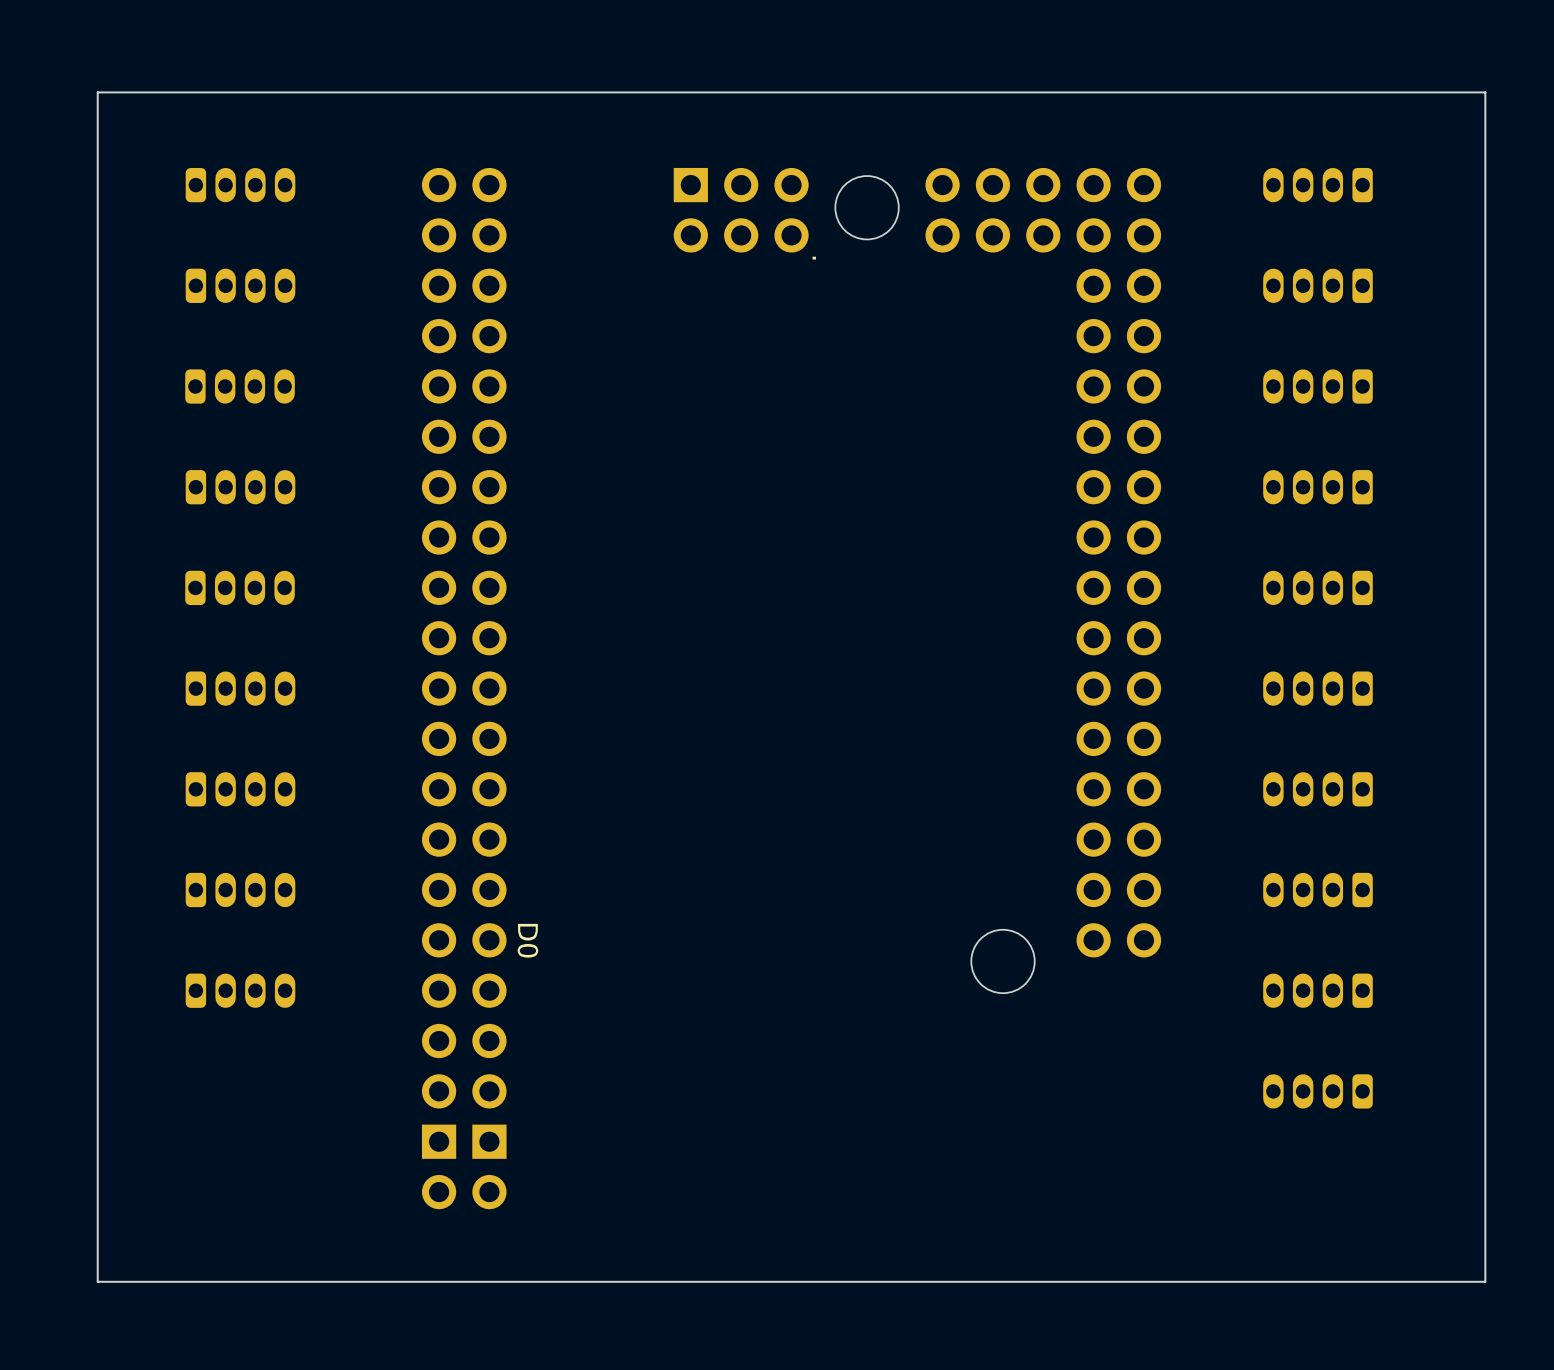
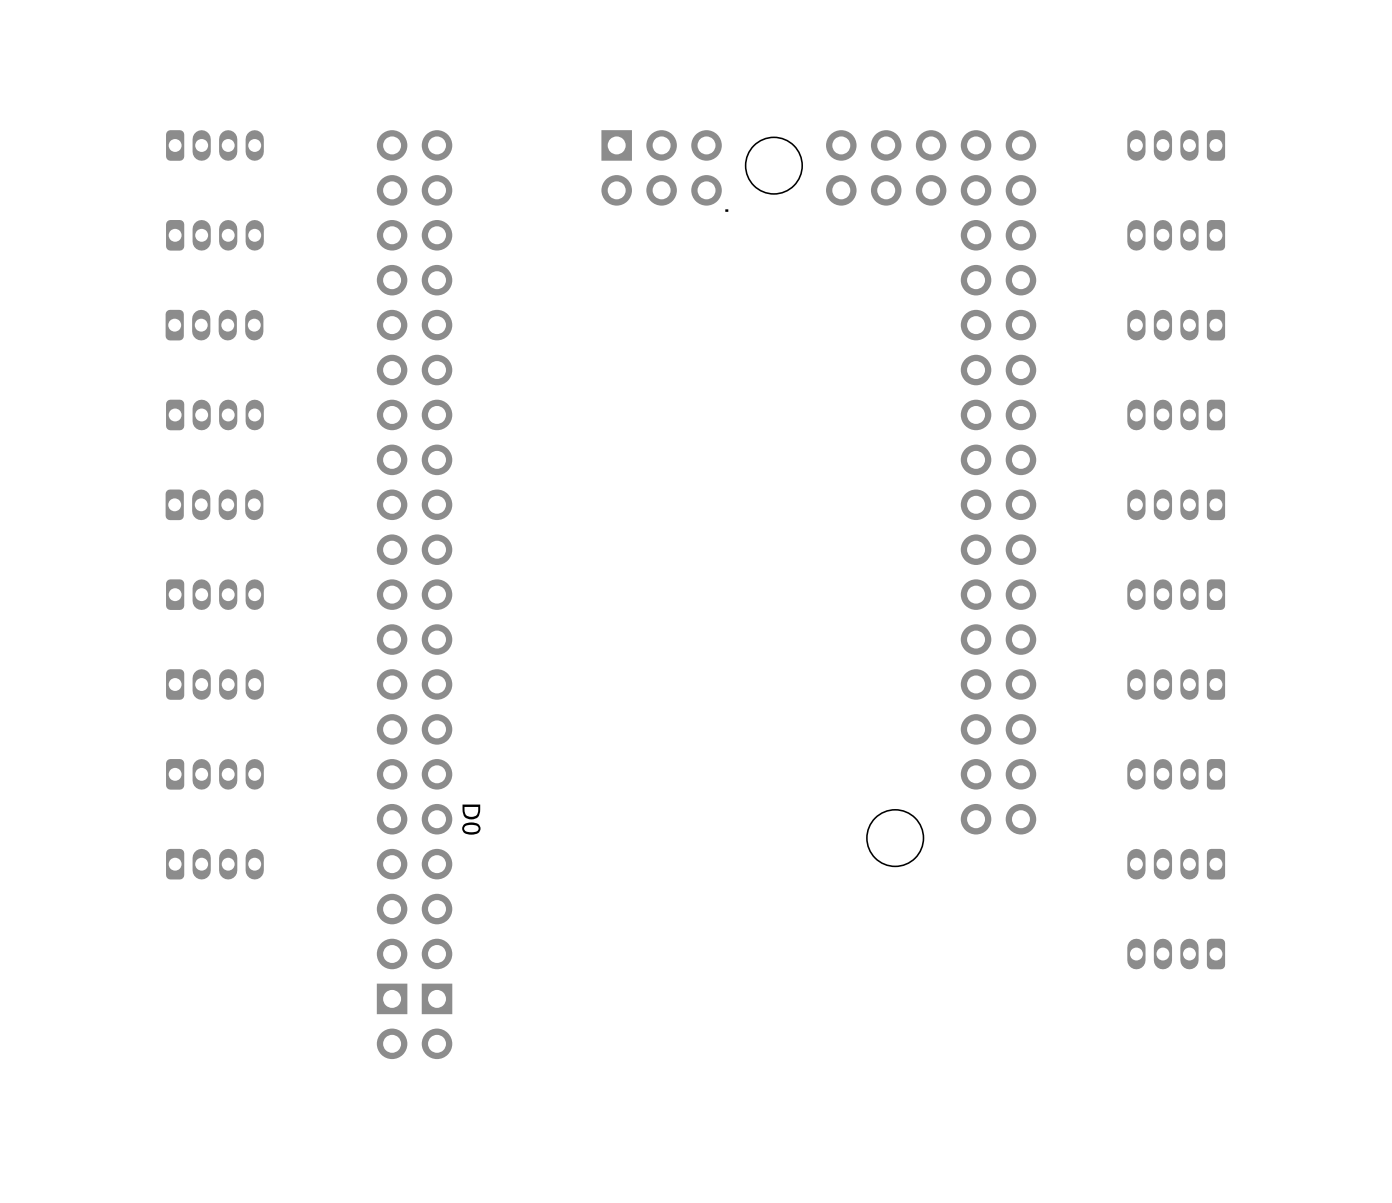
board edge: (1485, 92) (97, 92) (97, 1281) (1485, 1281) (1485, 92) -> none

